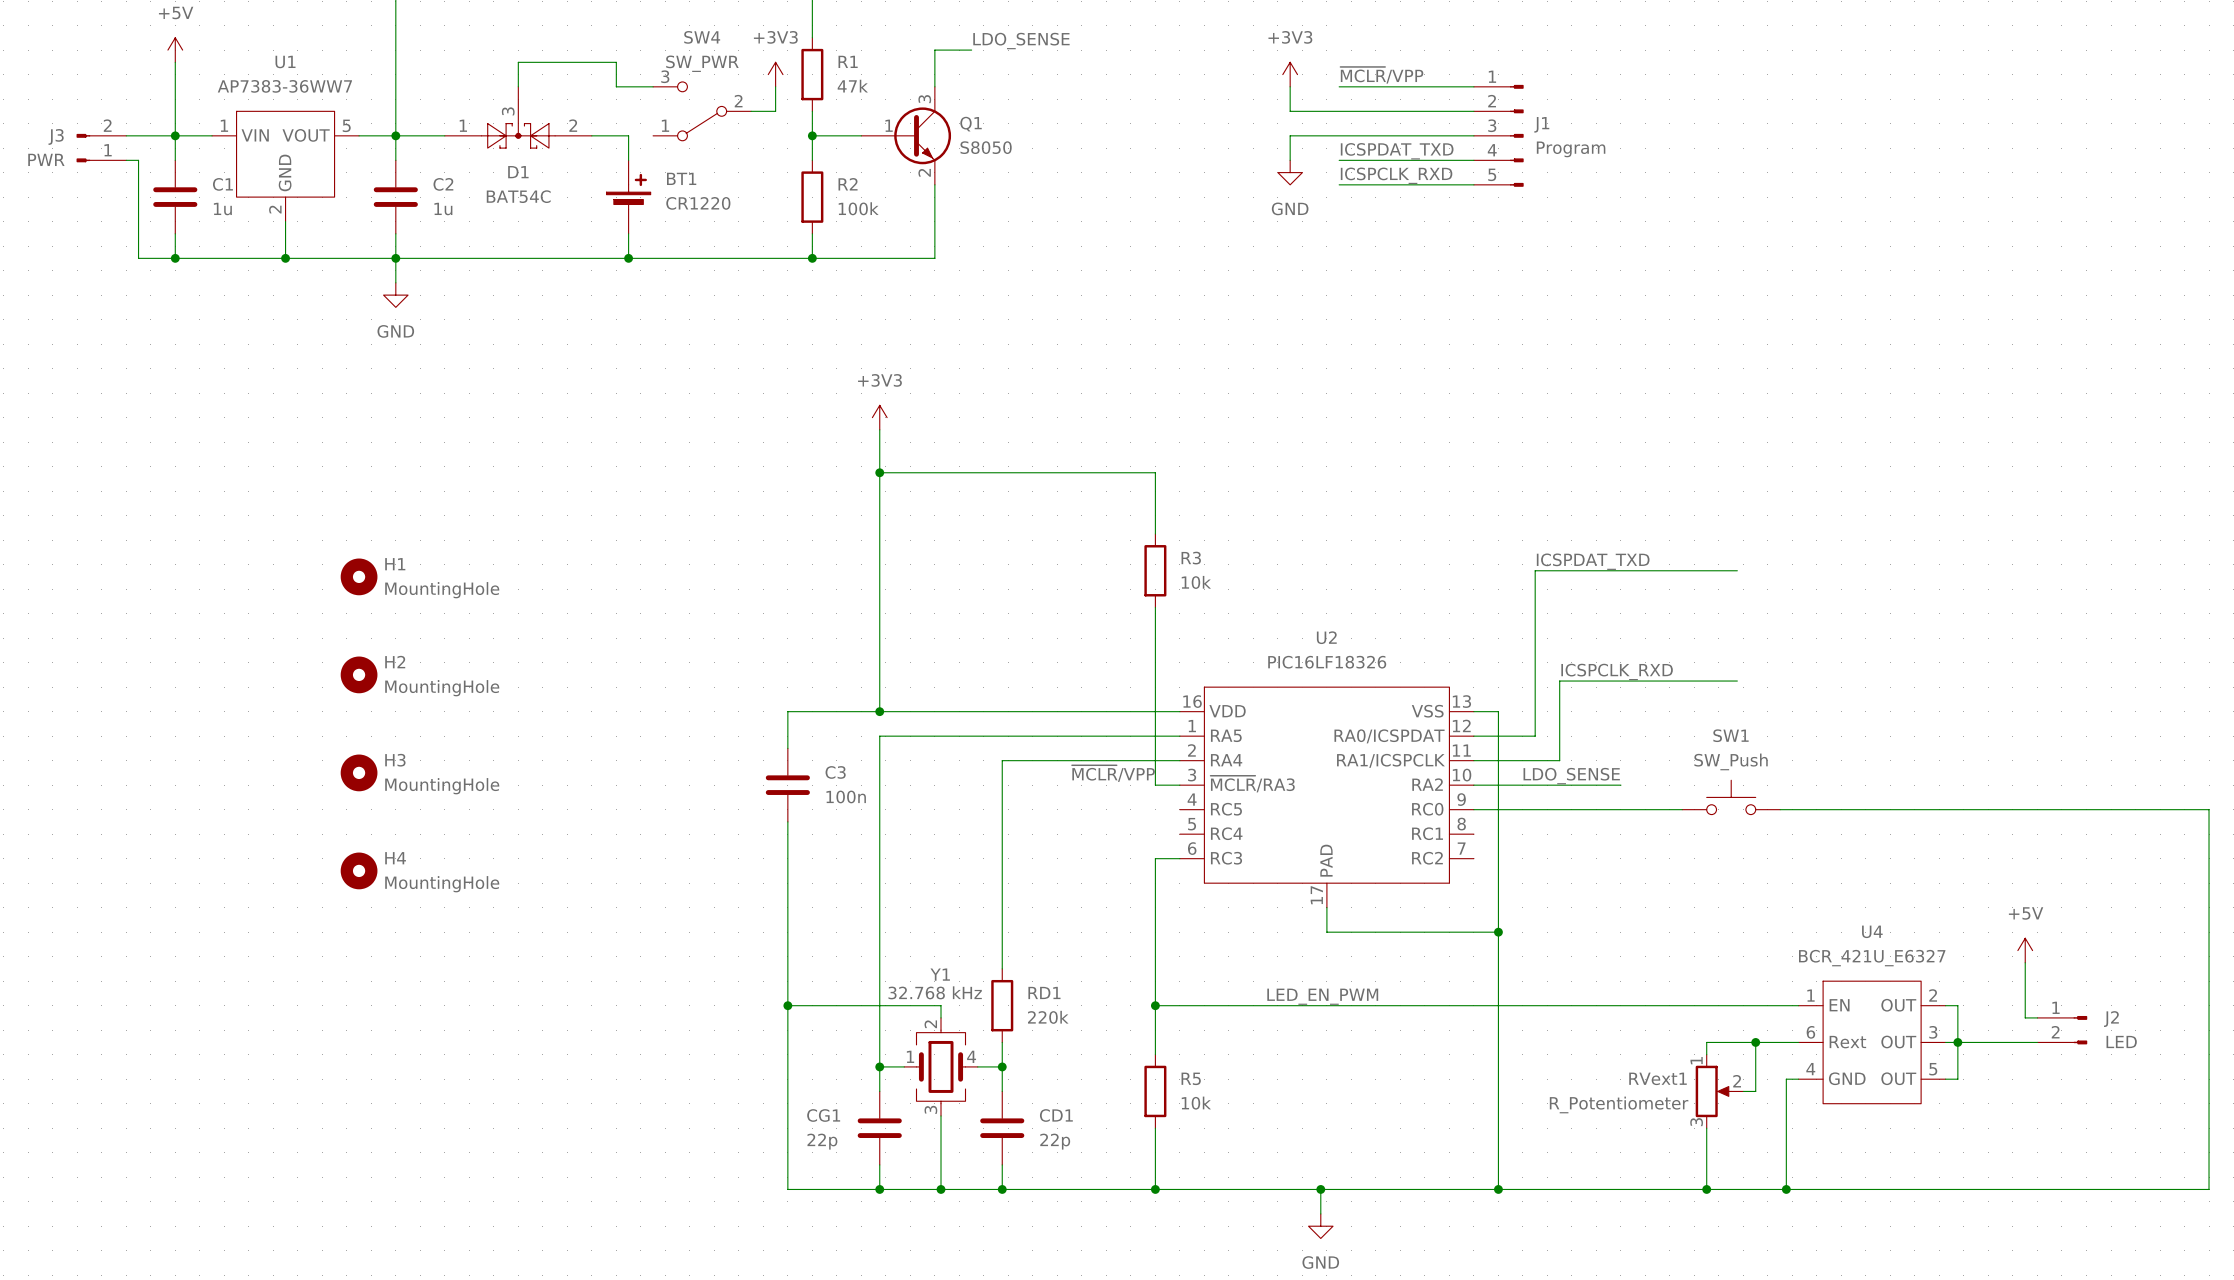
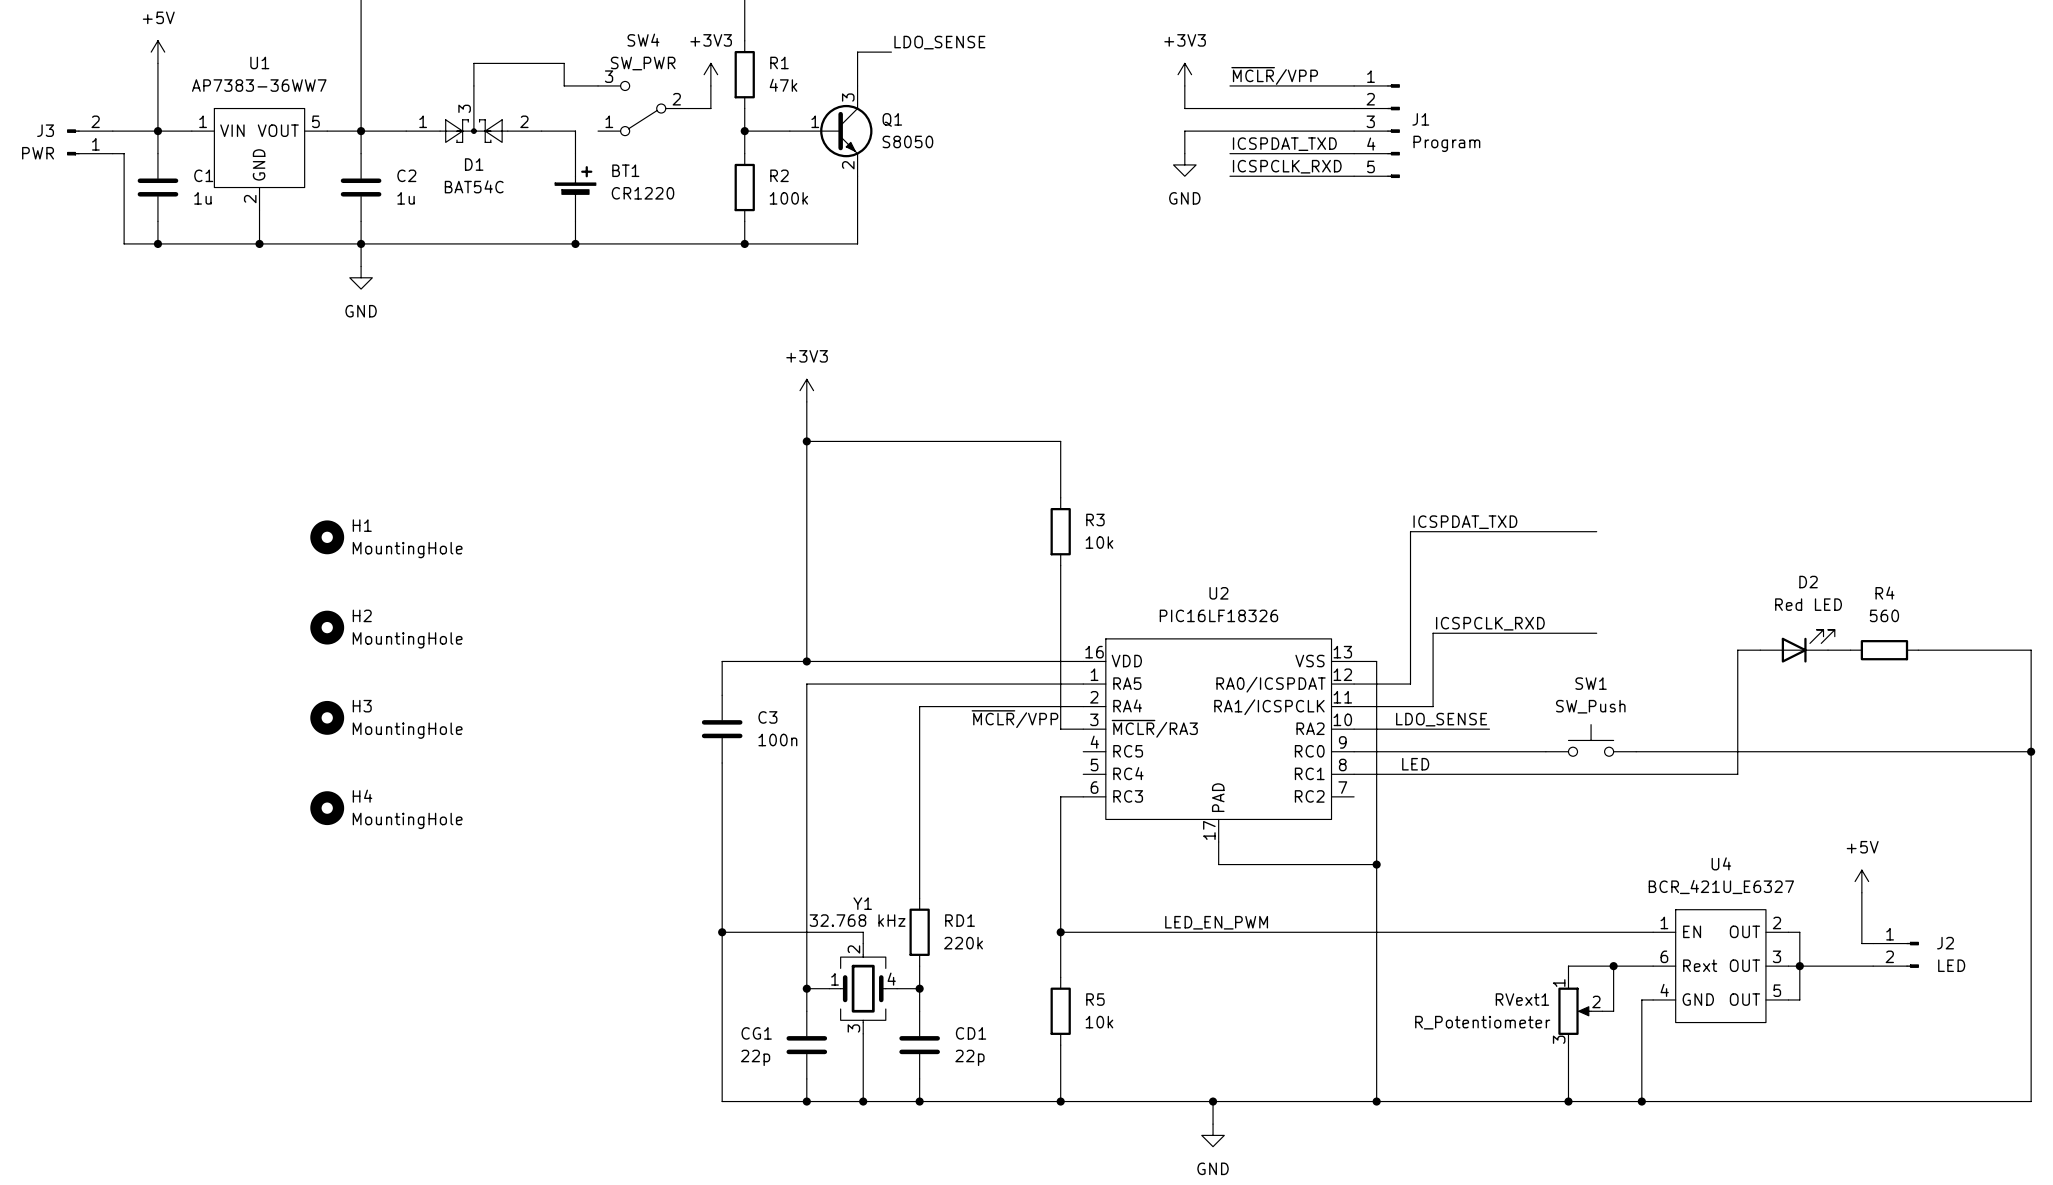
D2: none -> Red LED (1797, 646)
wire: none -> (1760, 650) (1737, 650) (1737, 774) (1354, 774)
wire: none -> (1828, 650) (1850, 650)
R4: none -> 560 (1884, 650)
wire: none -> (1918, 650) (2031, 650) (2031, 751)
junction: none -> (2031, 751)
label: none -> LED (1415, 764)

